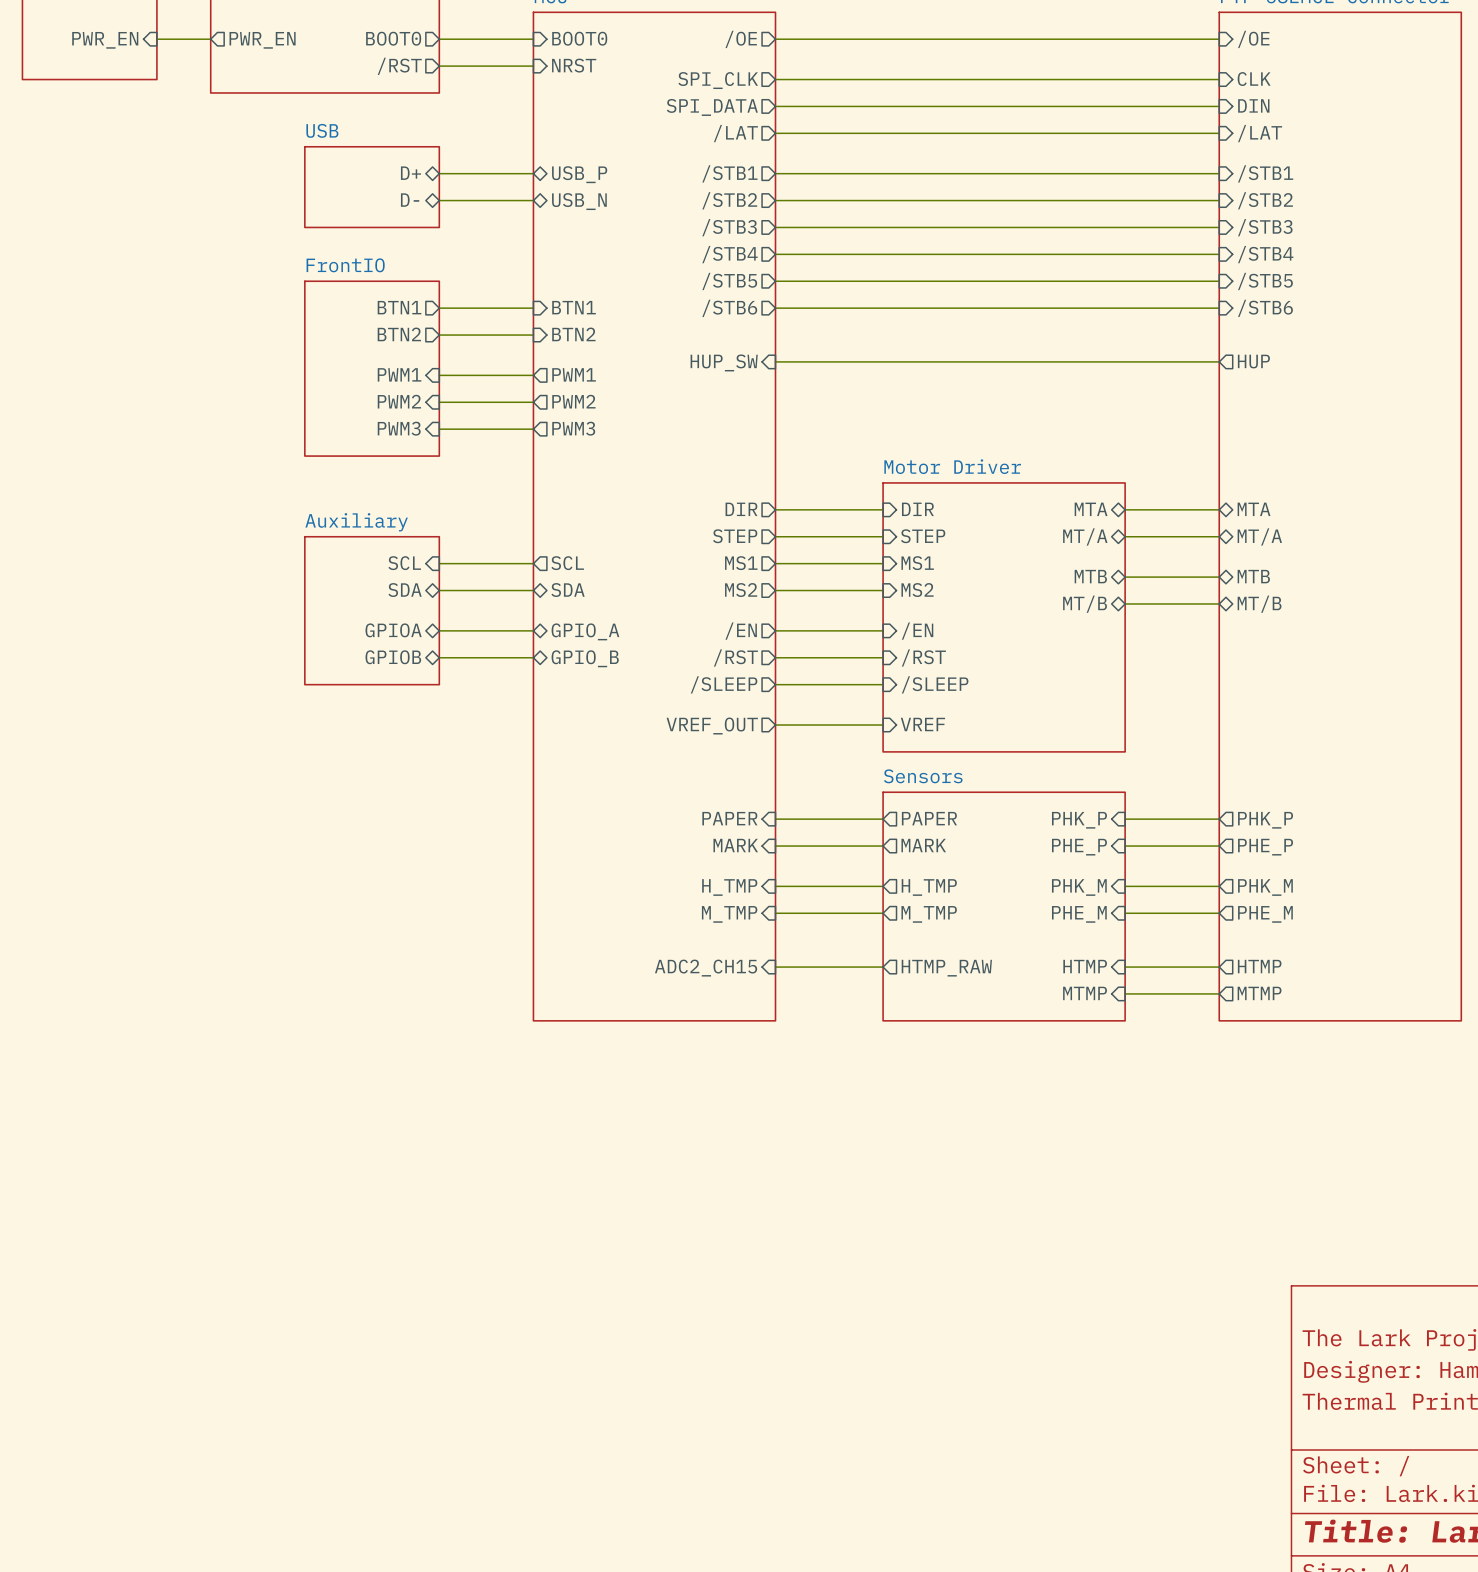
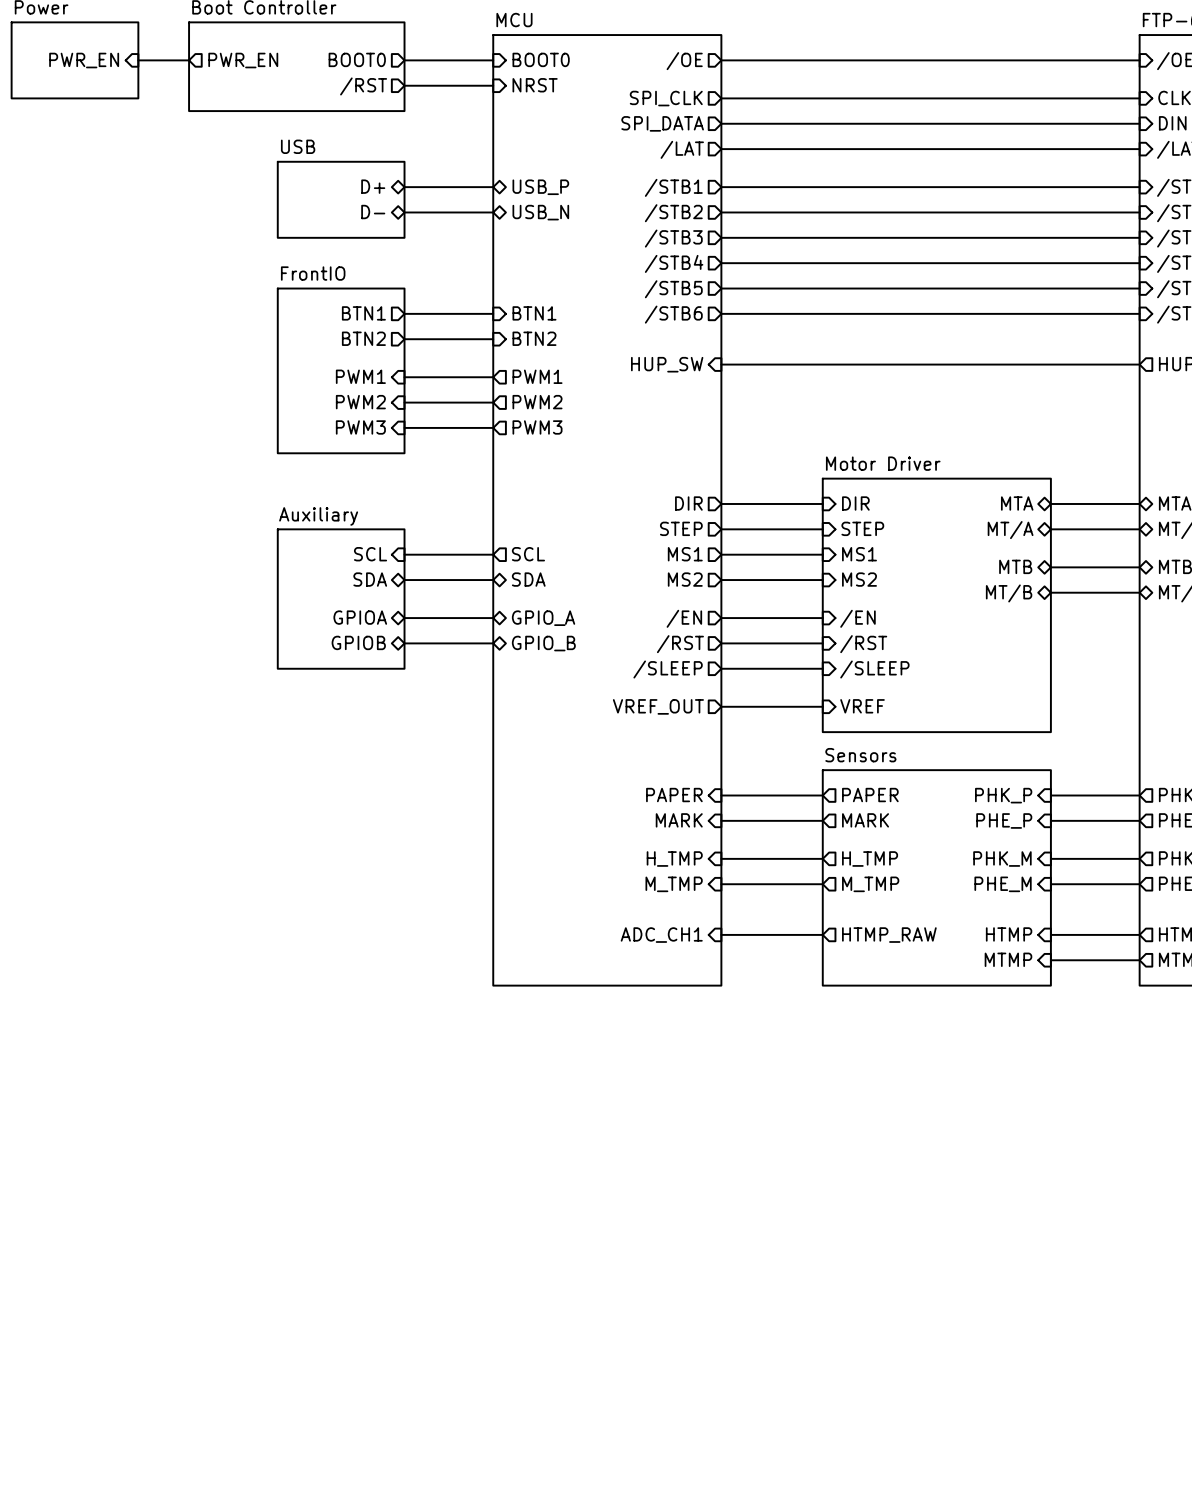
sheet pin: ADC2_CH15 (706, 968) -> ADC_CH1 (661, 935)

